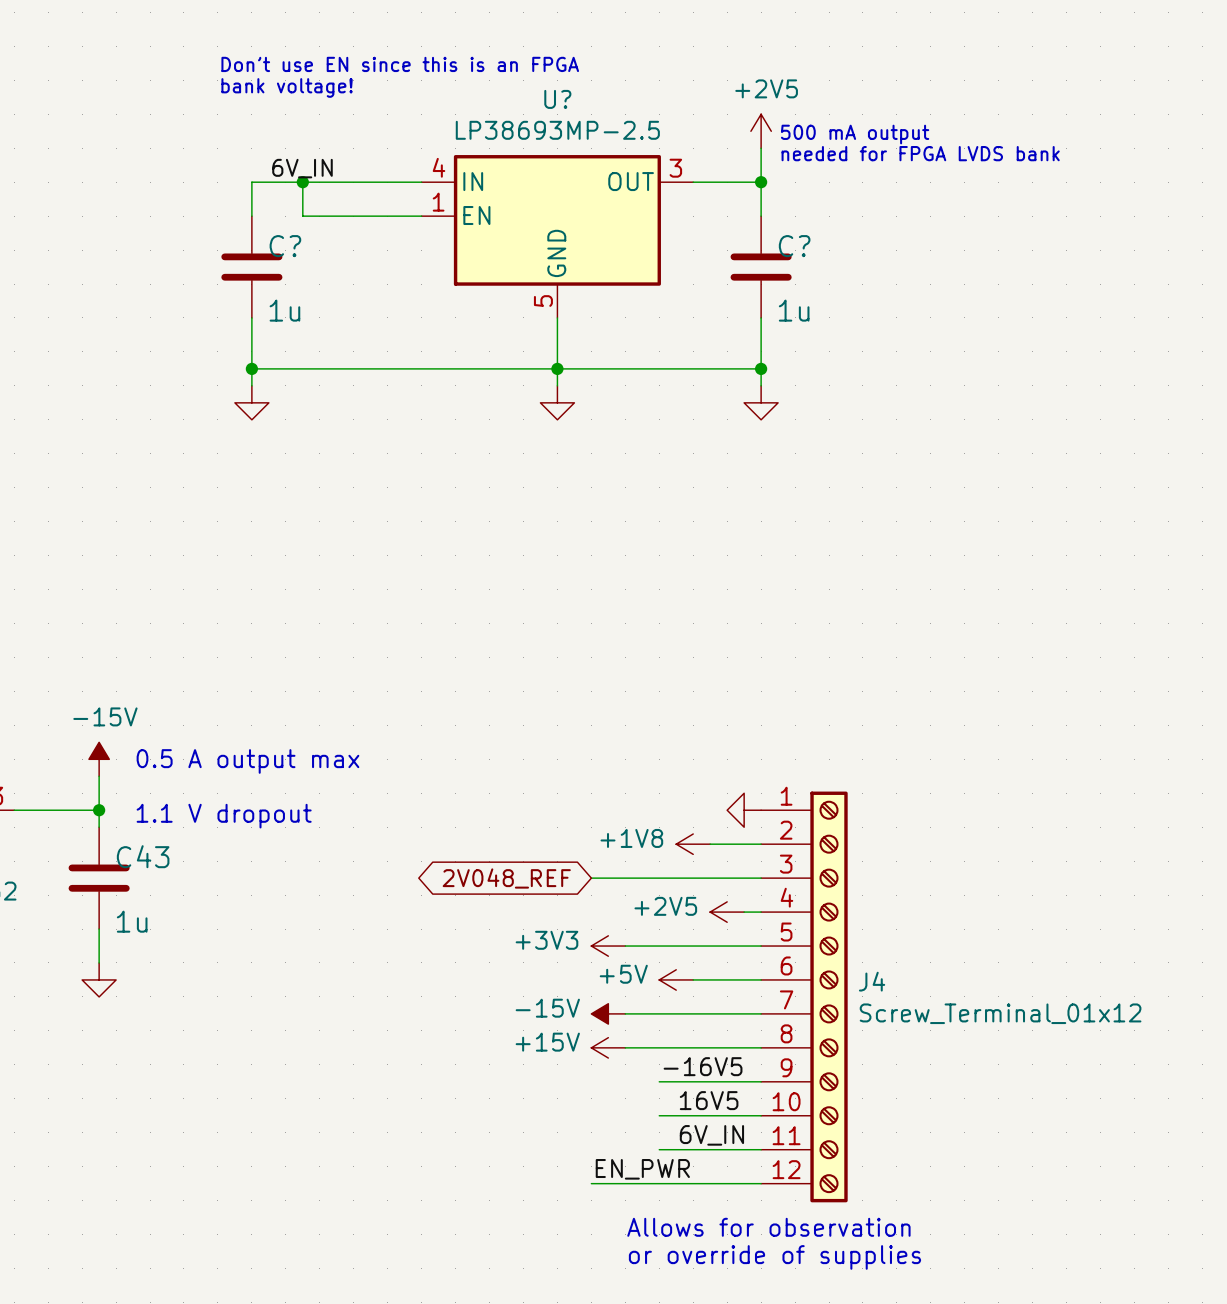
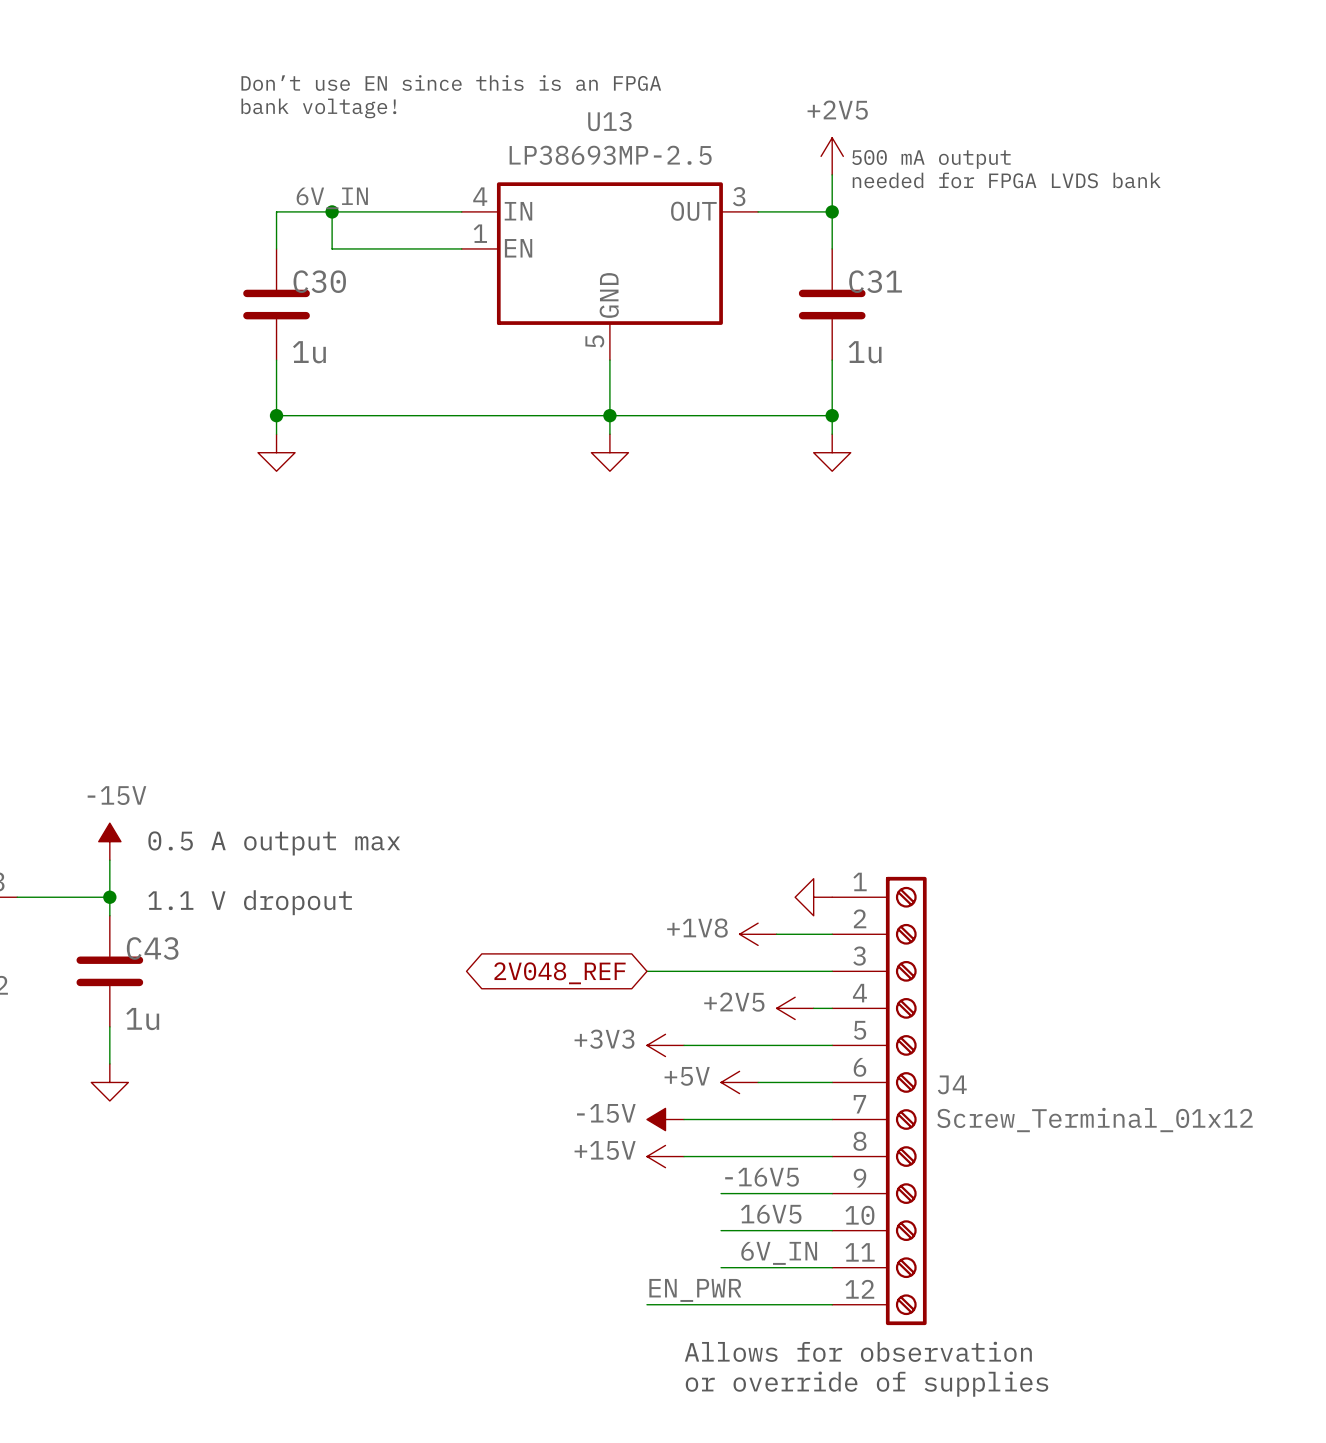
U? name: U? (557, 99) -> U13 (609, 121)
C? name: C? (285, 246) -> C30 (319, 281)
C? name: C? (794, 246) -> C31 (875, 281)

